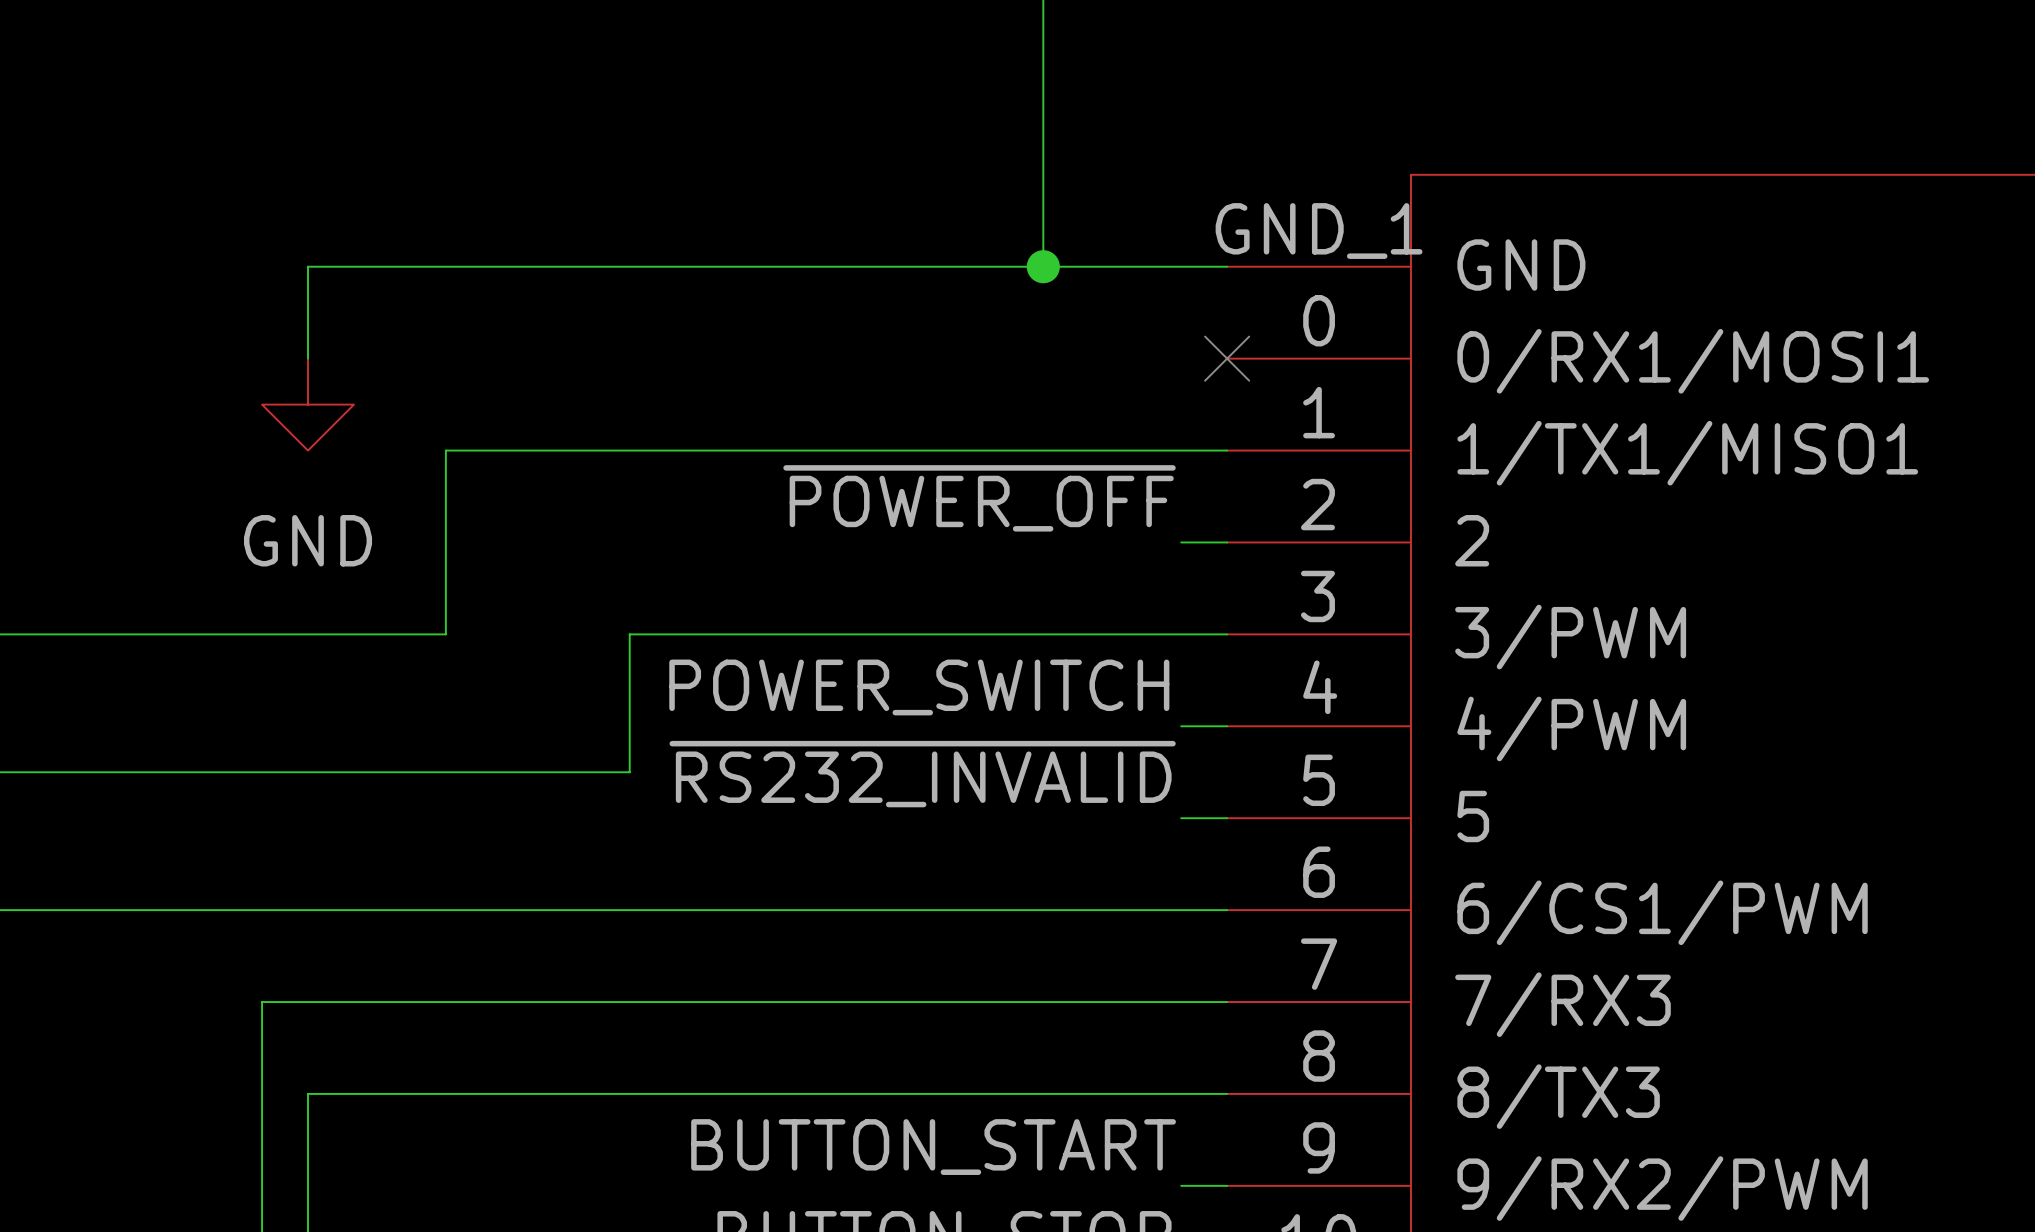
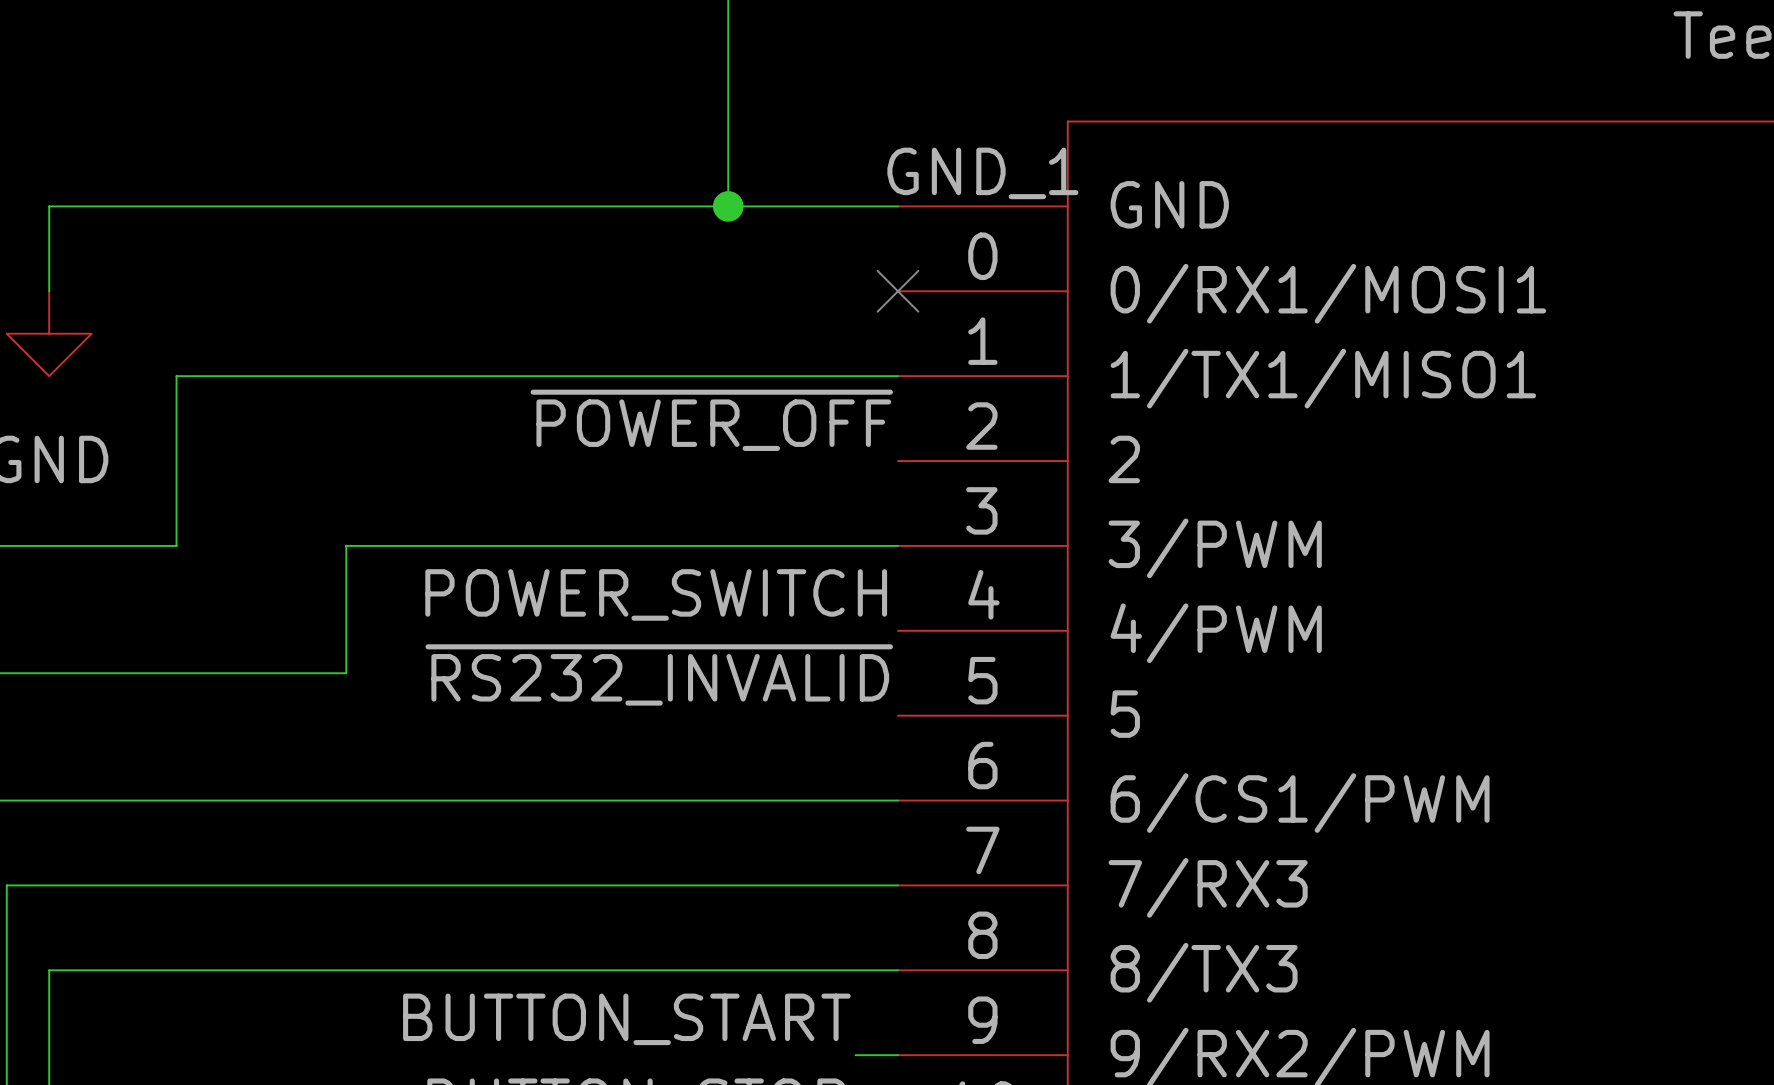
label position: ~{POWER_OFF} (979, 498) -> ~{POWER_OFF} (711, 420)
wire: (1181, 542) (1227, 542) -> none
label position: POWER_SWITCH (919, 687) -> POWER_SWITCH (656, 594)
wire: (1181, 726) (1227, 726) -> none
label position: ~{RS232_INVALID} (922, 774) -> ~{RS232_INVALID} (659, 674)
wire: (1181, 818) (1227, 818) -> none

